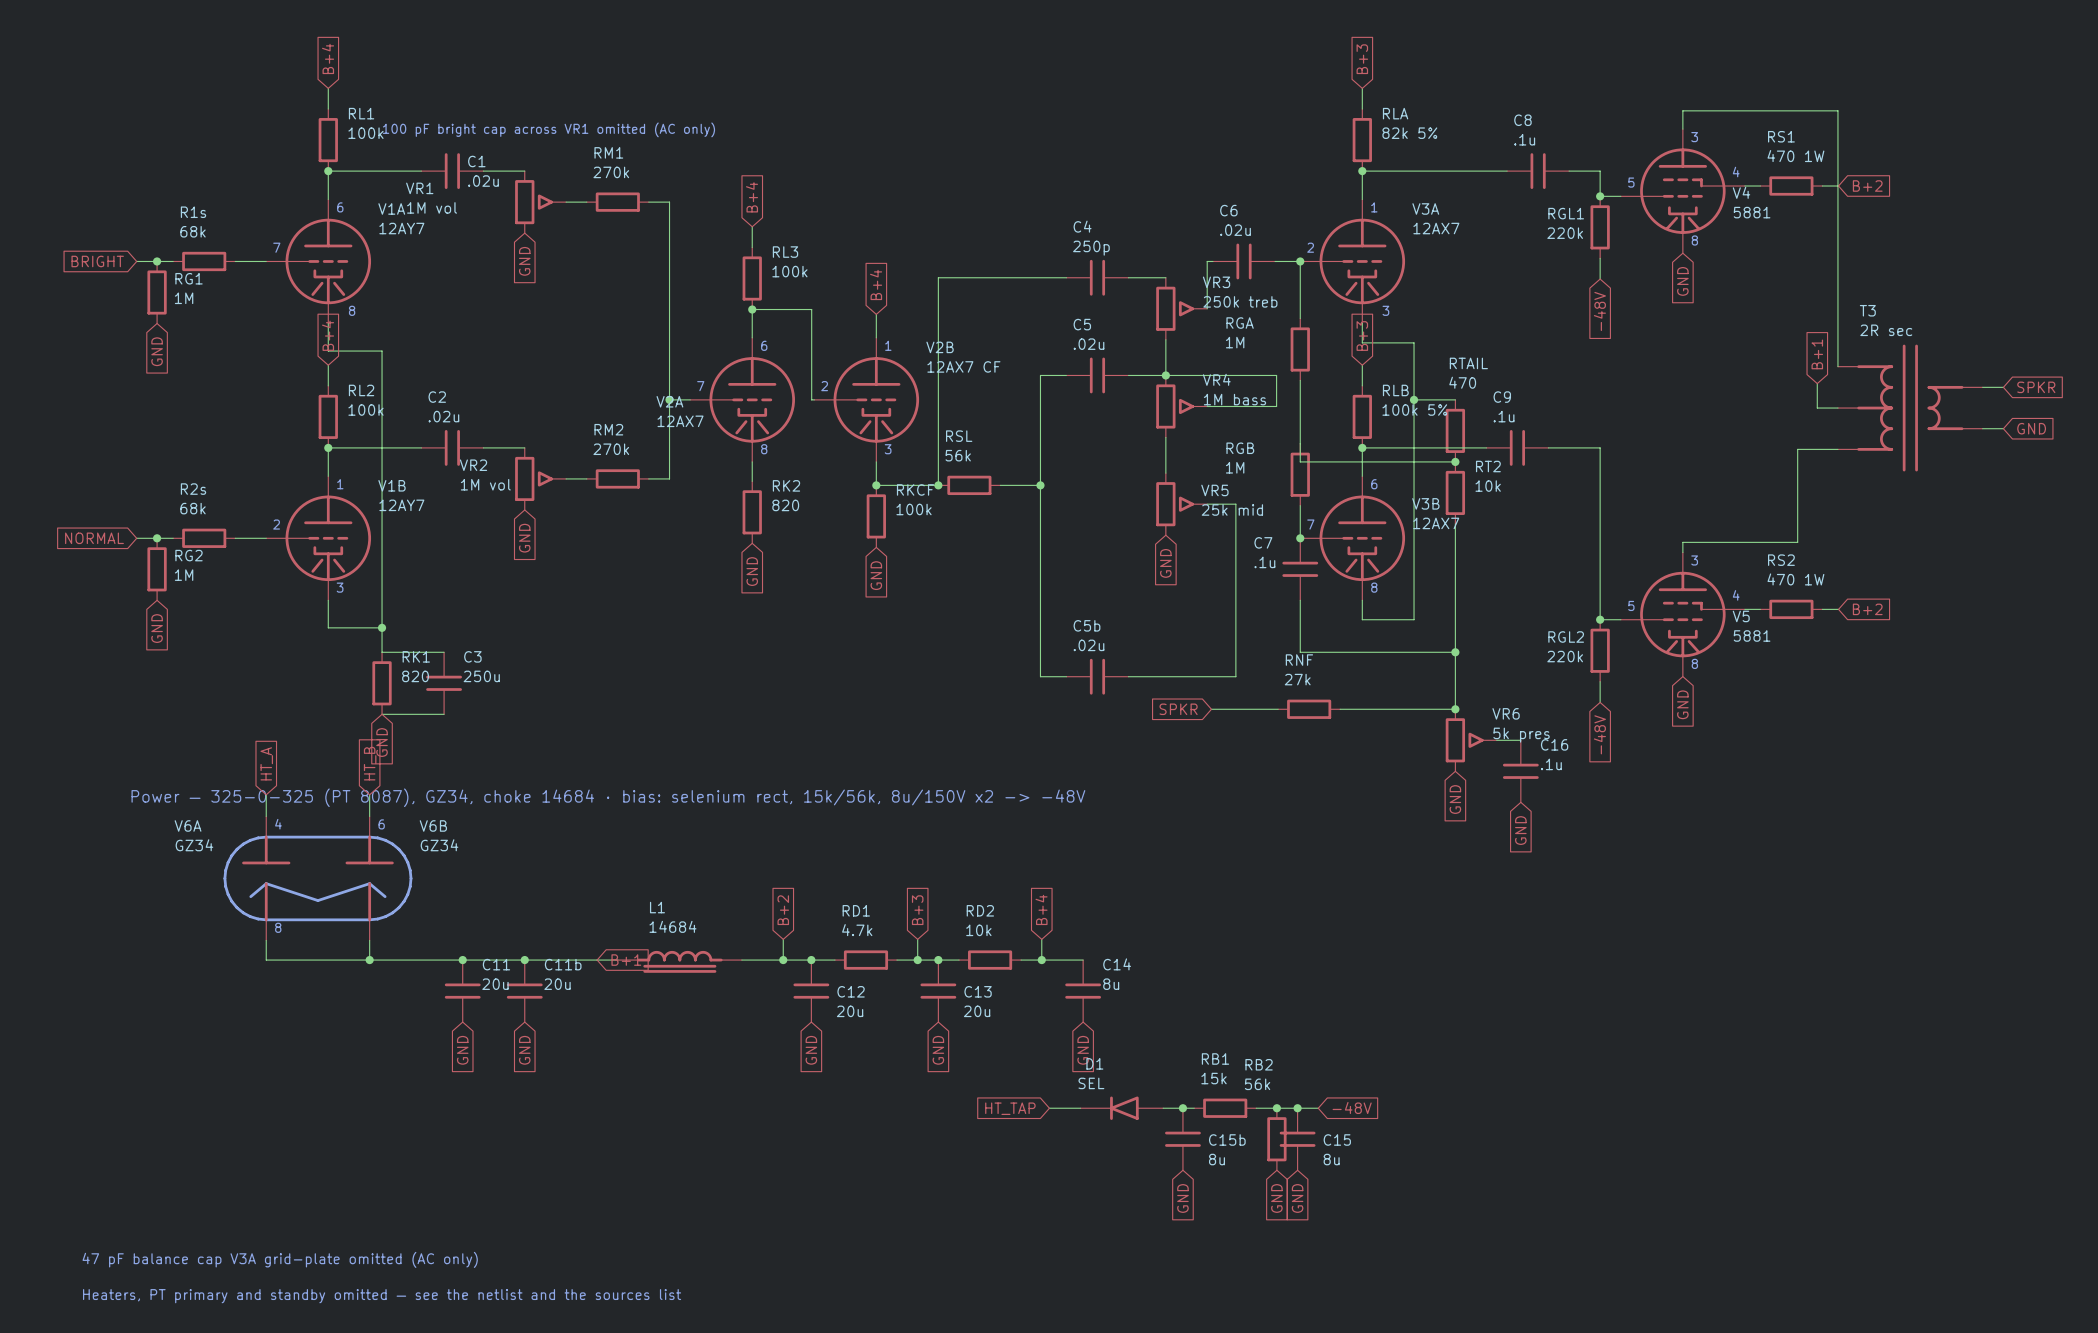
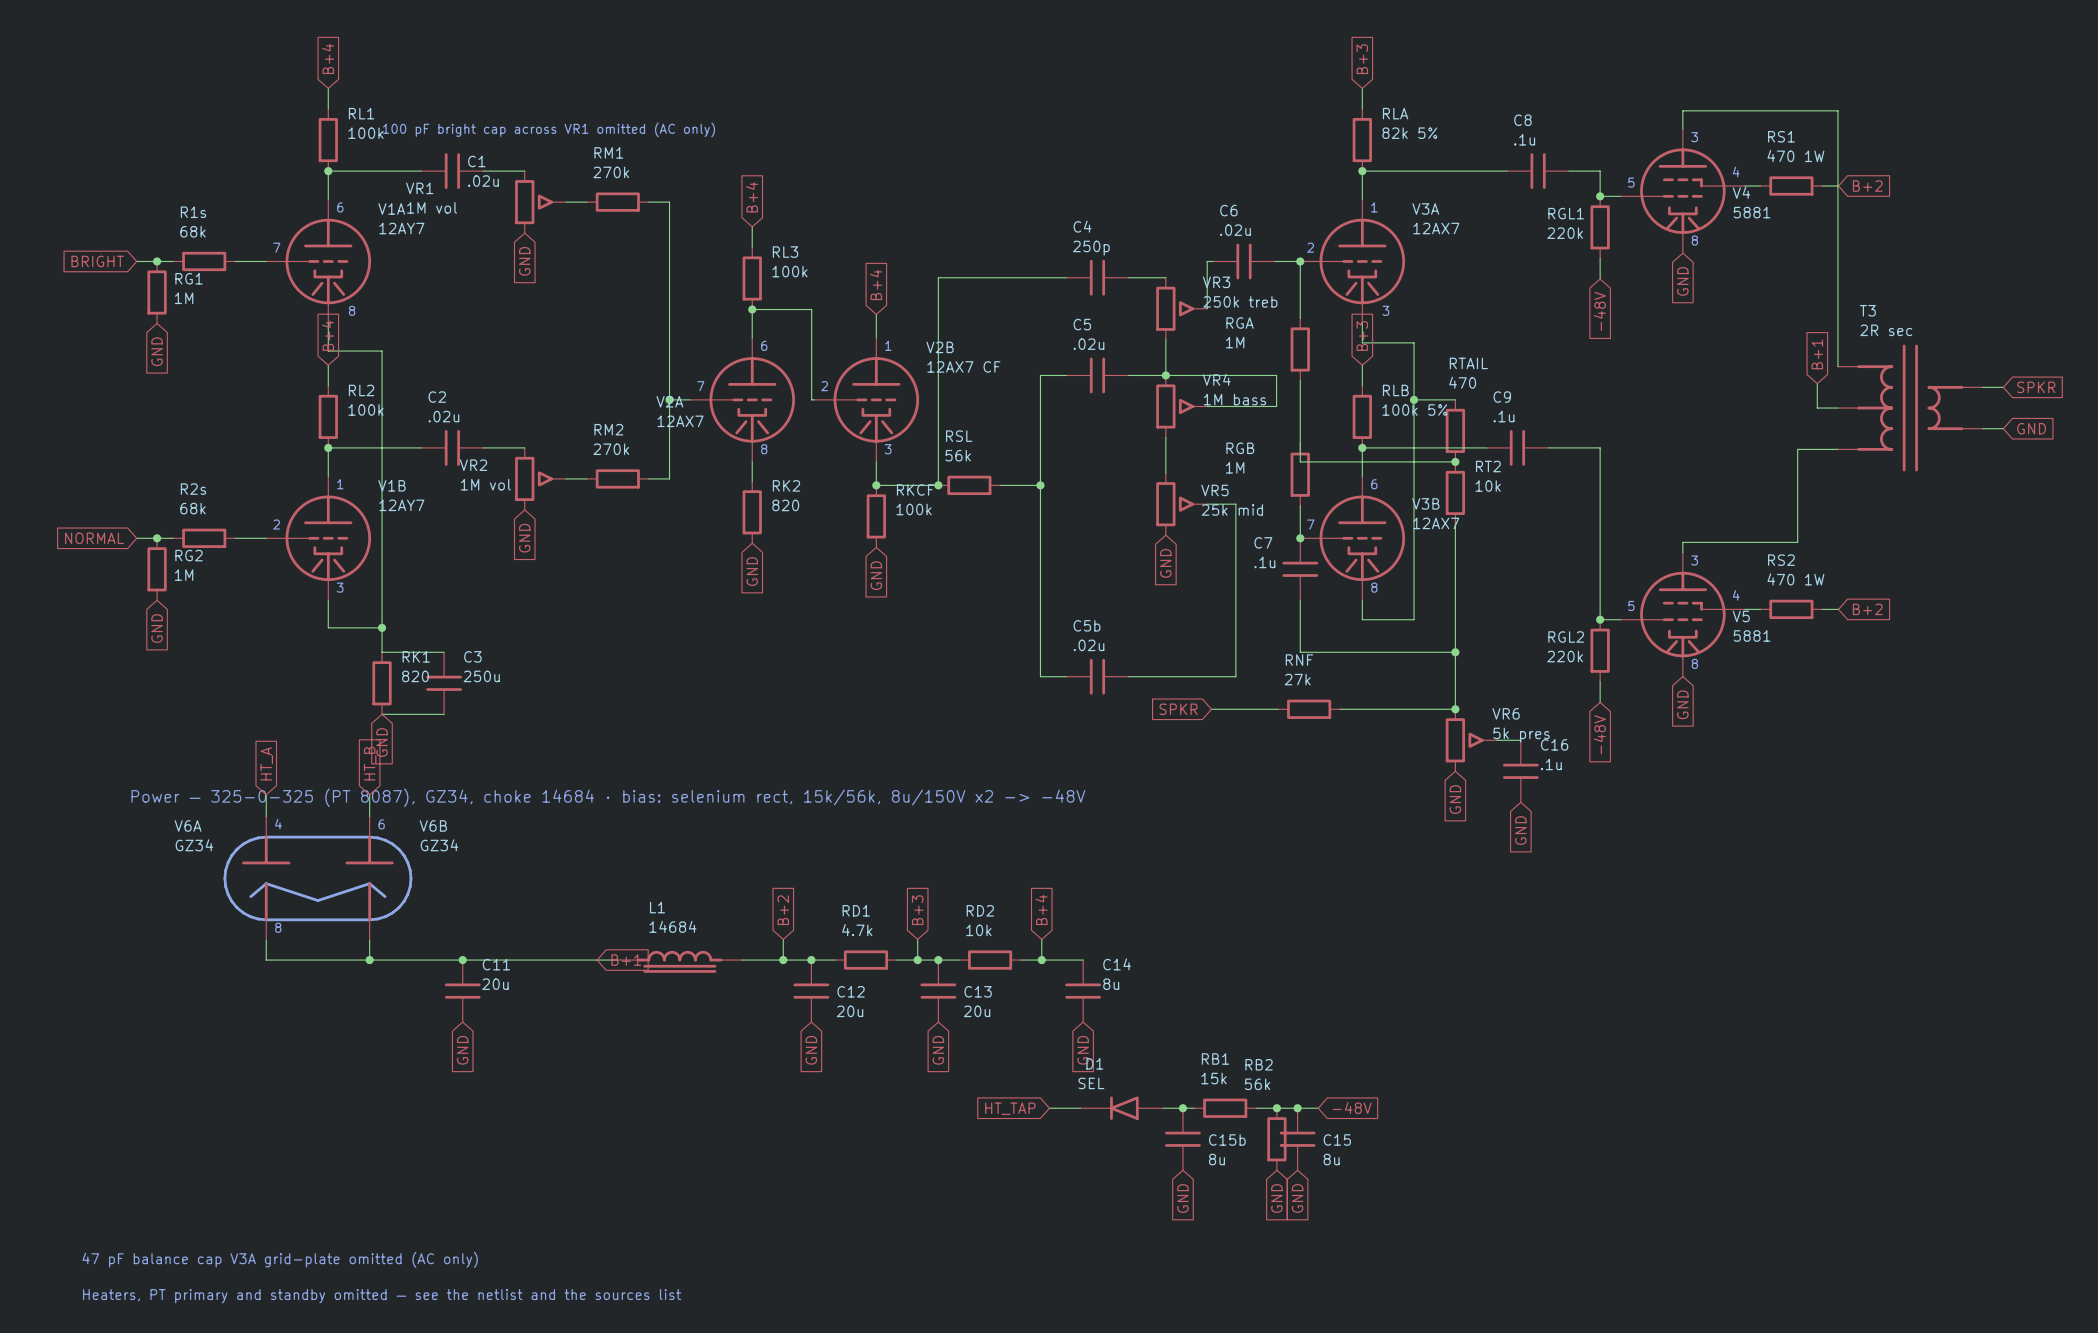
junction: (524, 960) -> none
C11b: 20u (524, 991) -> none
global label: GND (524, 1050) -> none

